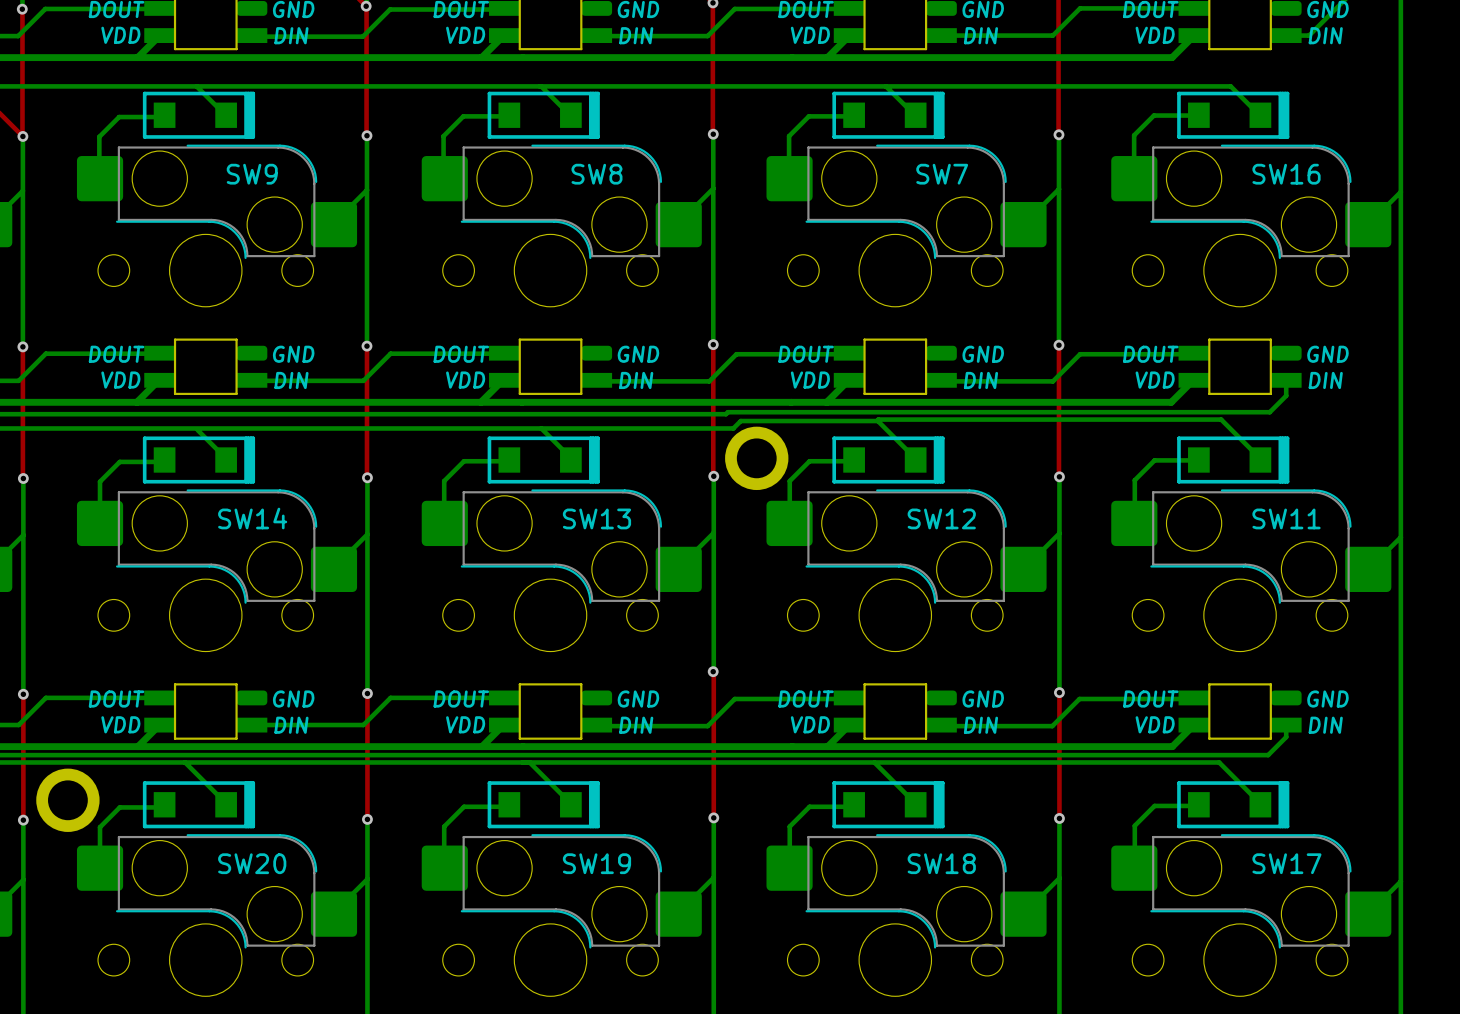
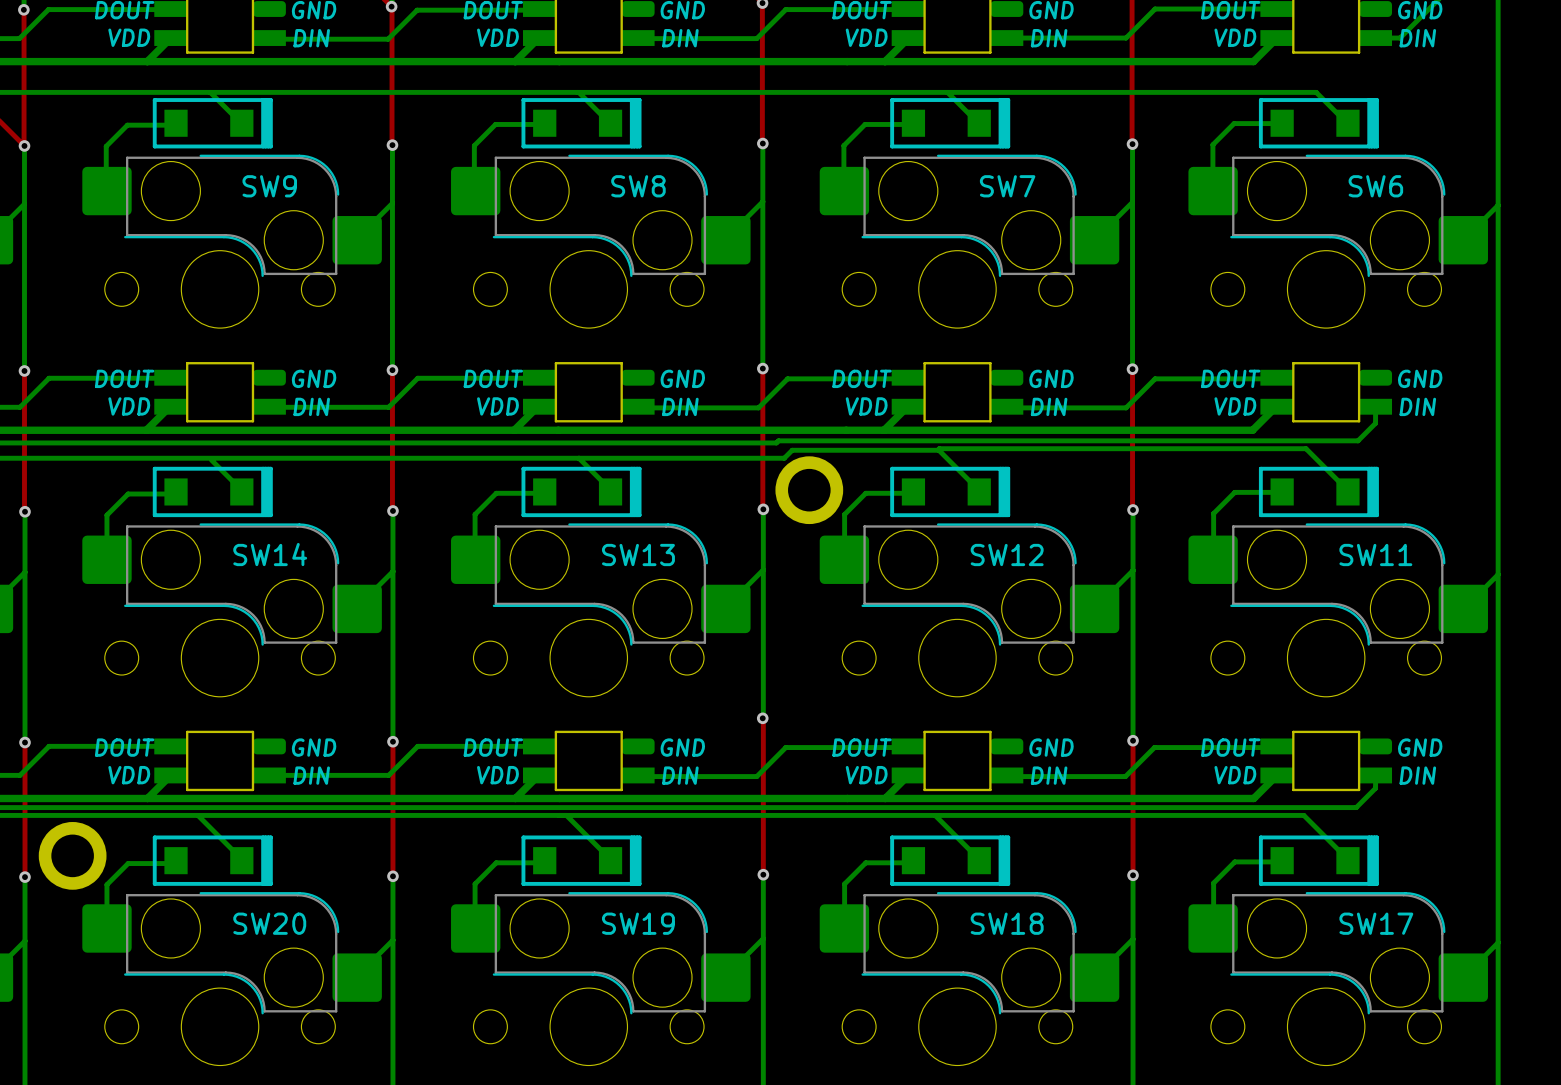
SW16 name: SW16 (1286, 174) -> SW6 (1375, 186)

